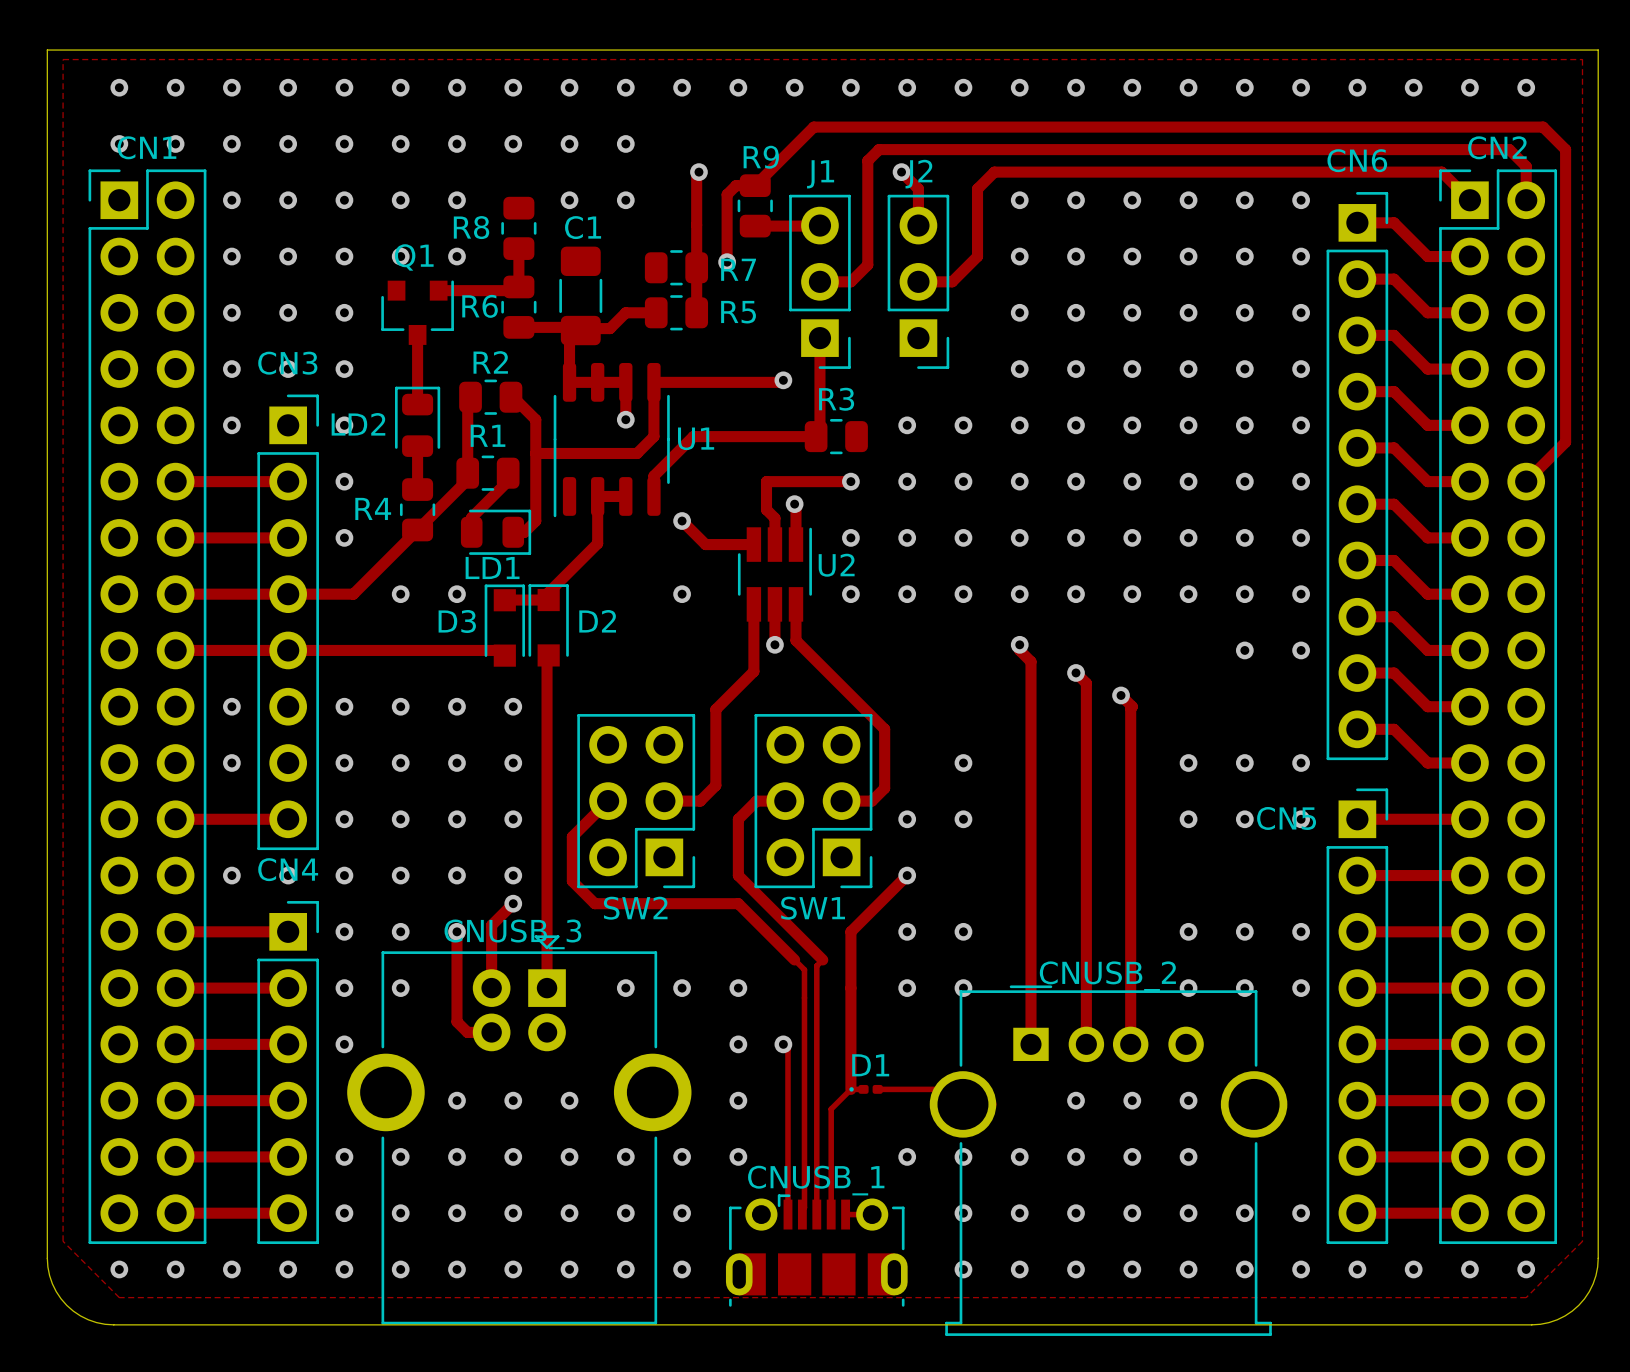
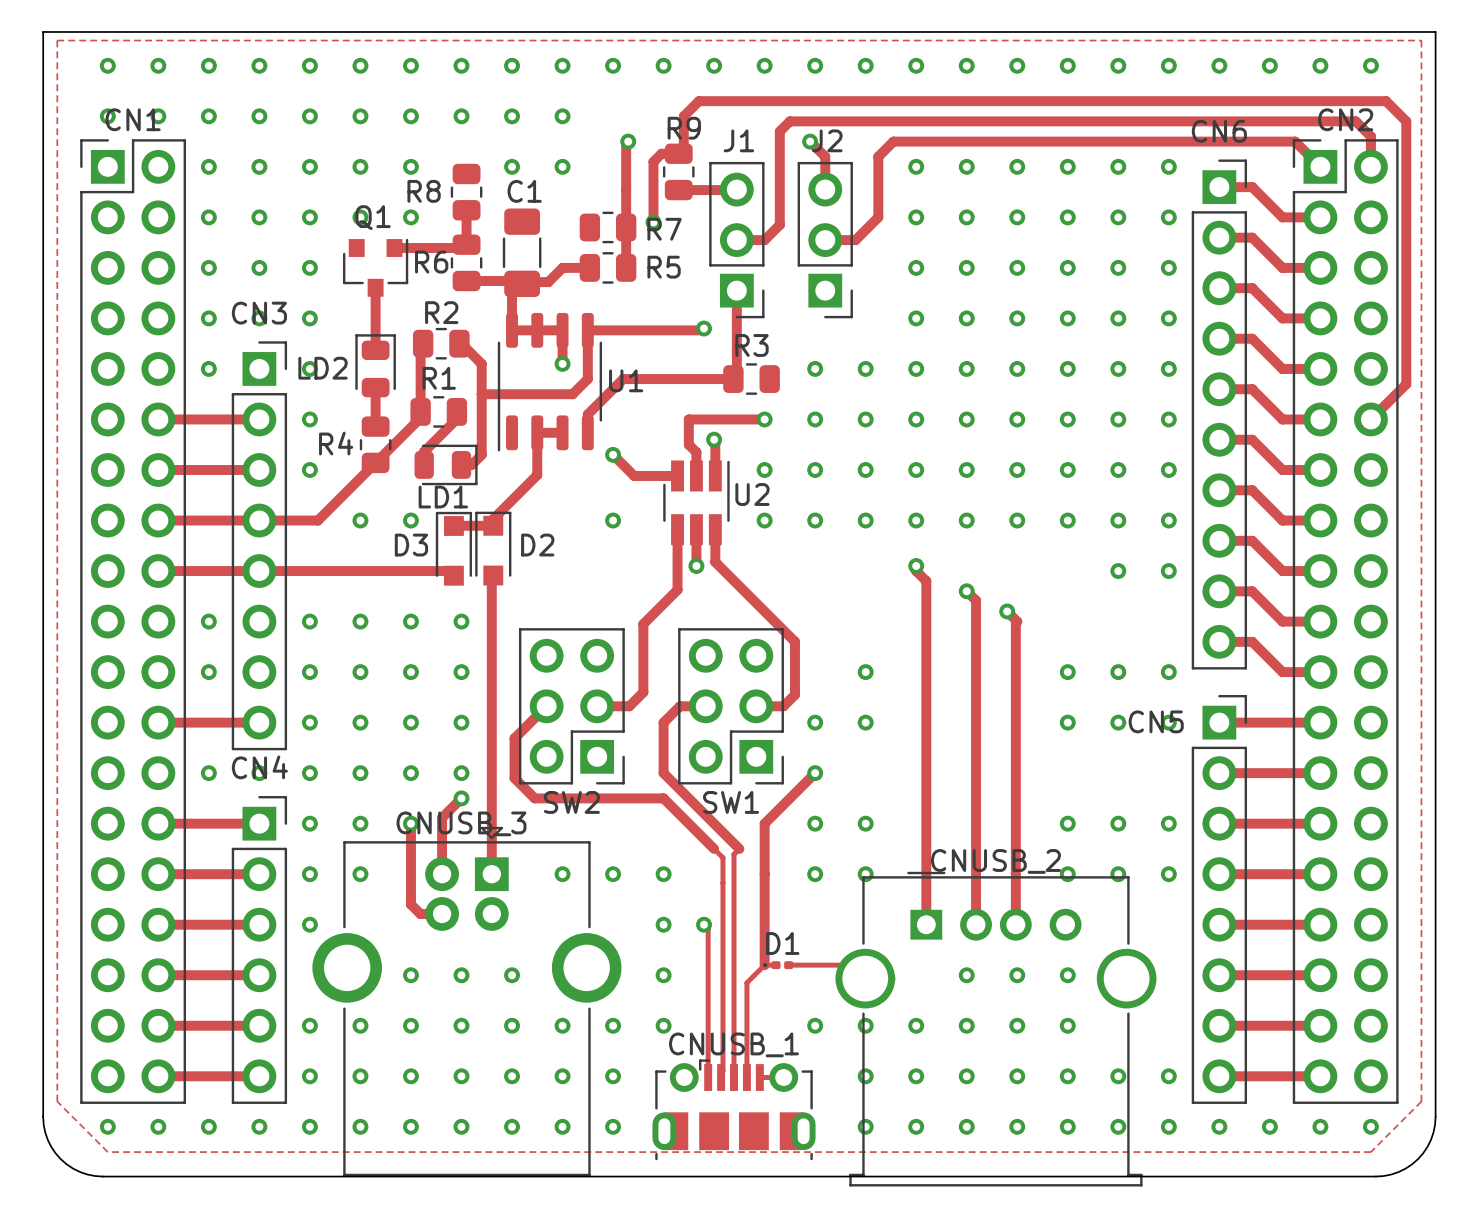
track: (813, 127) (755, 185) -> (731, 101) (698, 101) (683, 116) (683, 153) (678, 153)

